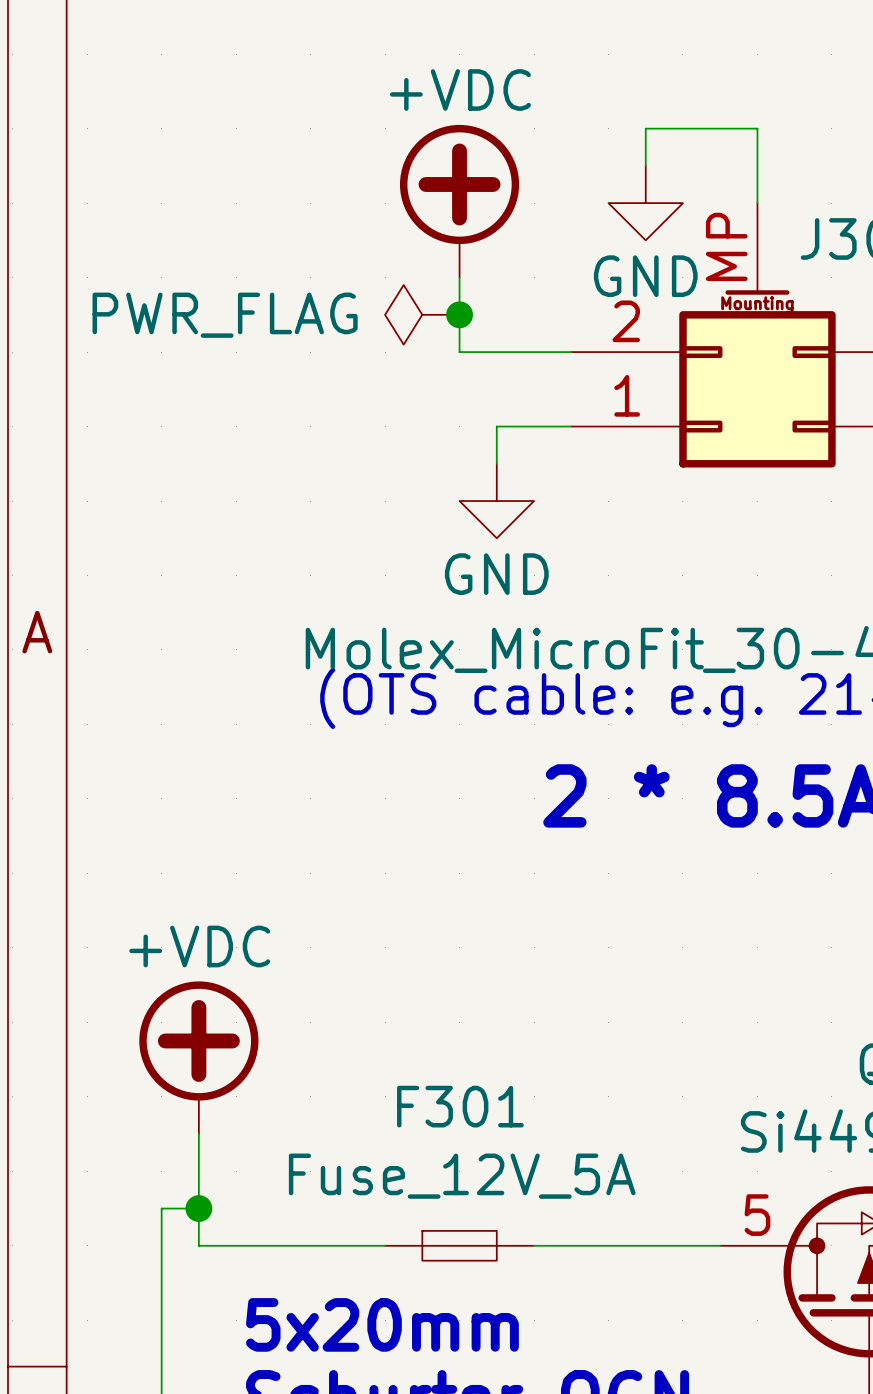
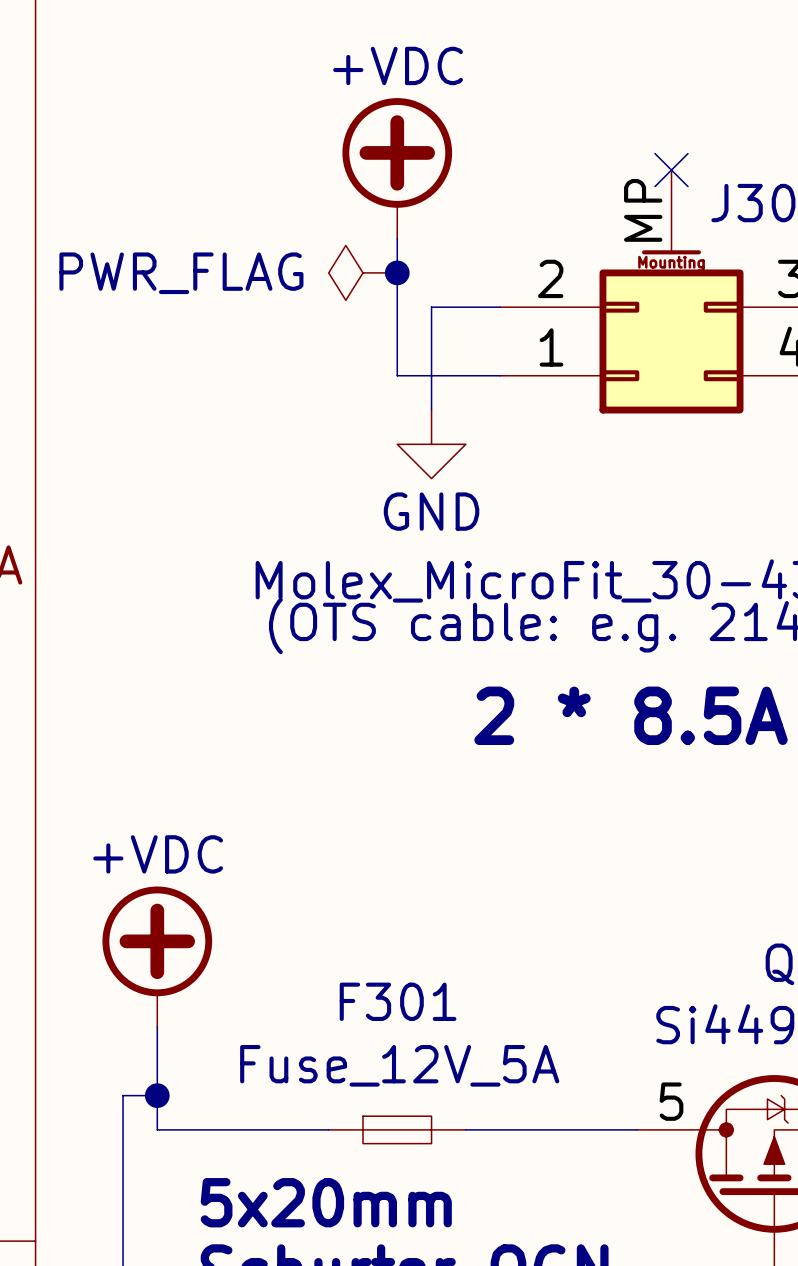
wire: (645, 165) (645, 128) (757, 128) (757, 203) -> none
power symbol: GND (645, 203) -> none
no-connect mark: none -> (671, 170)
wire: (459, 352) (496, 352) -> (397, 307) (397, 375) (431, 375) (431, 307)

